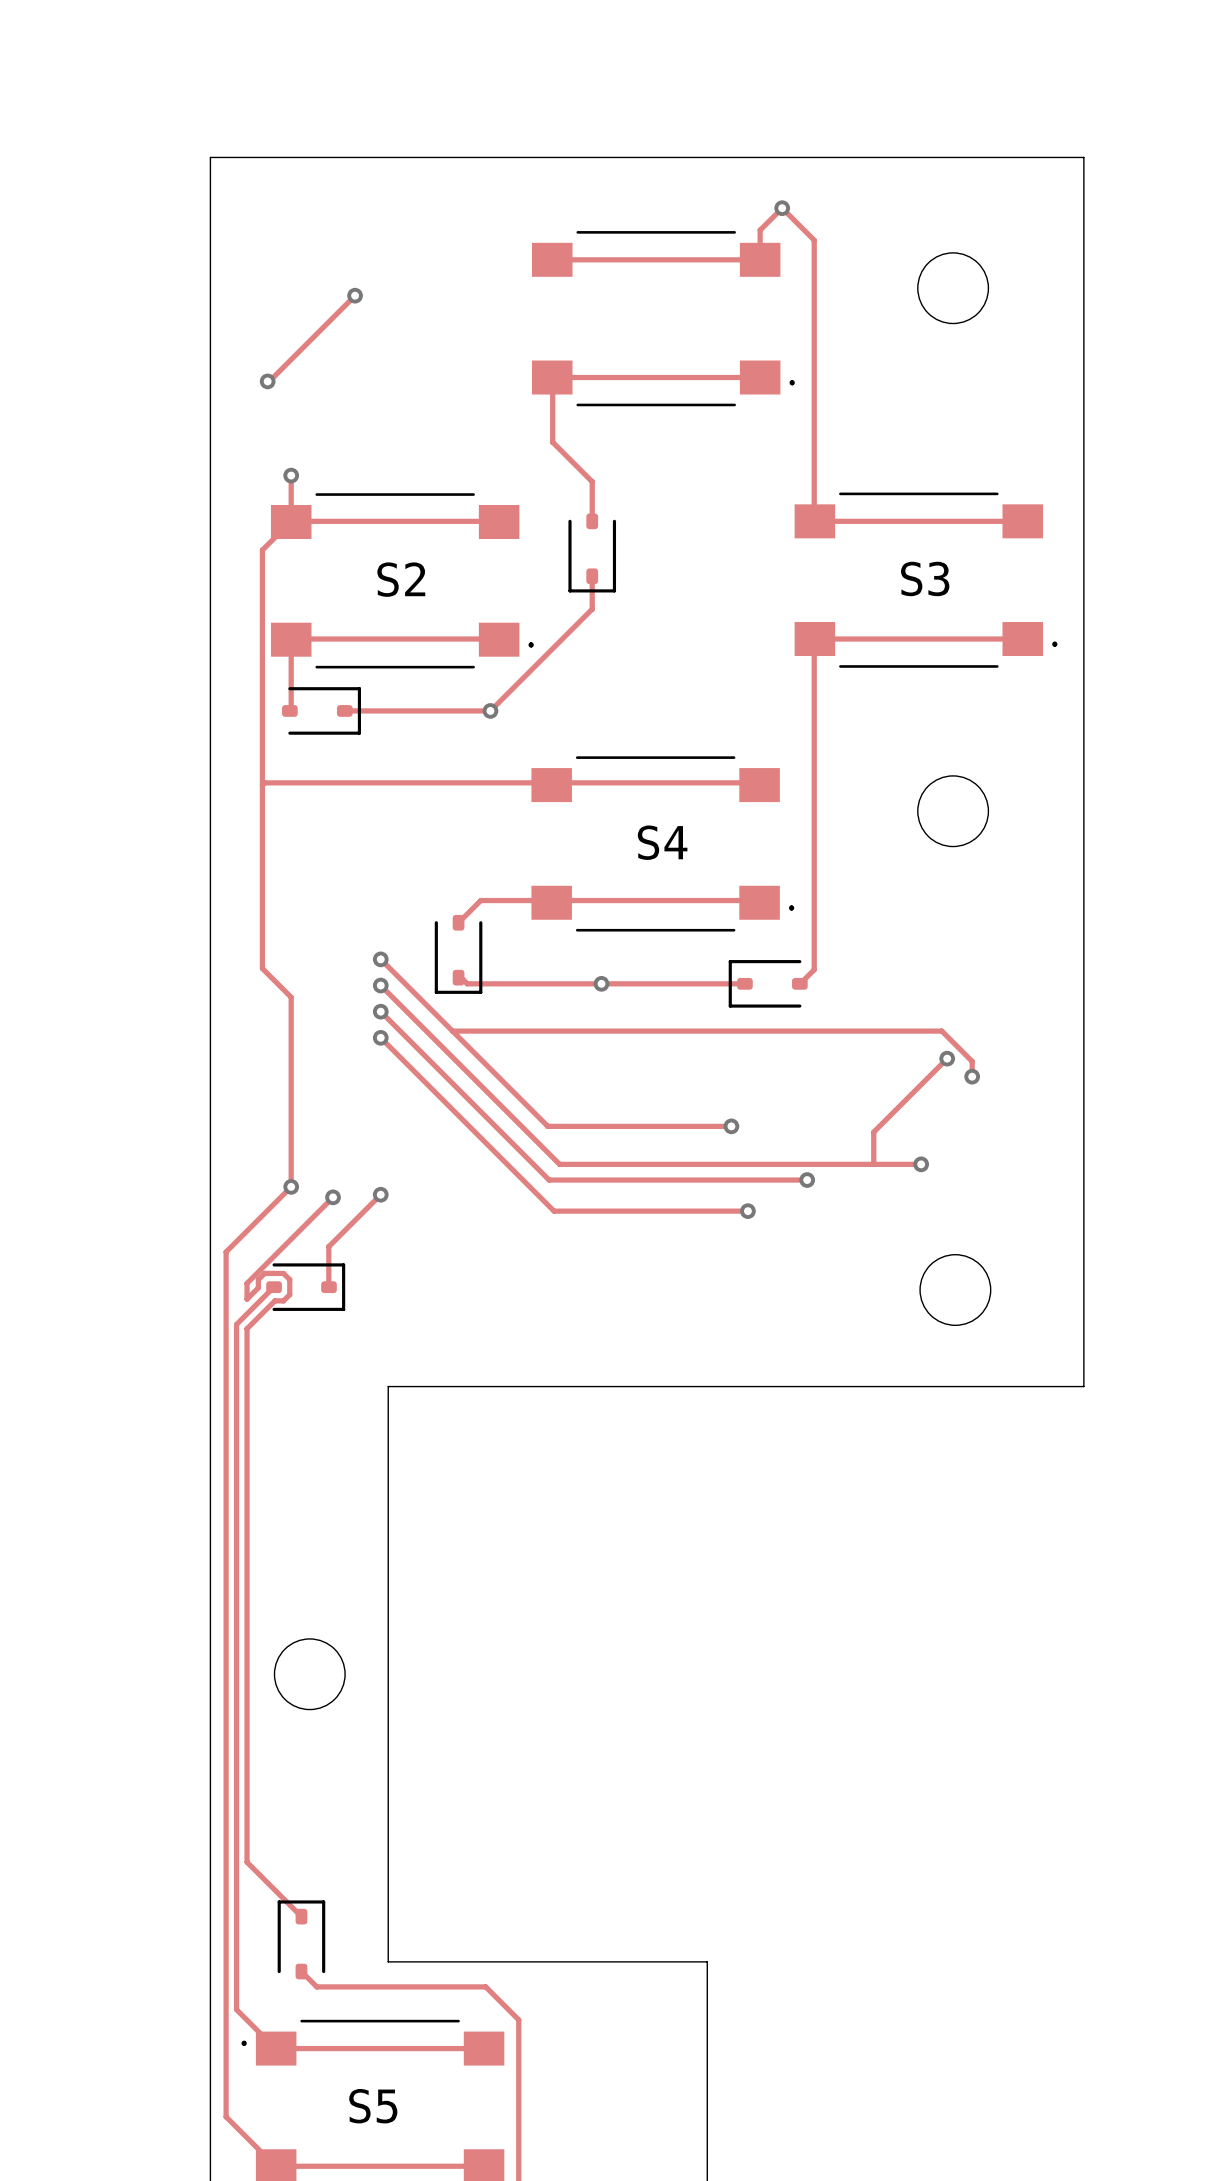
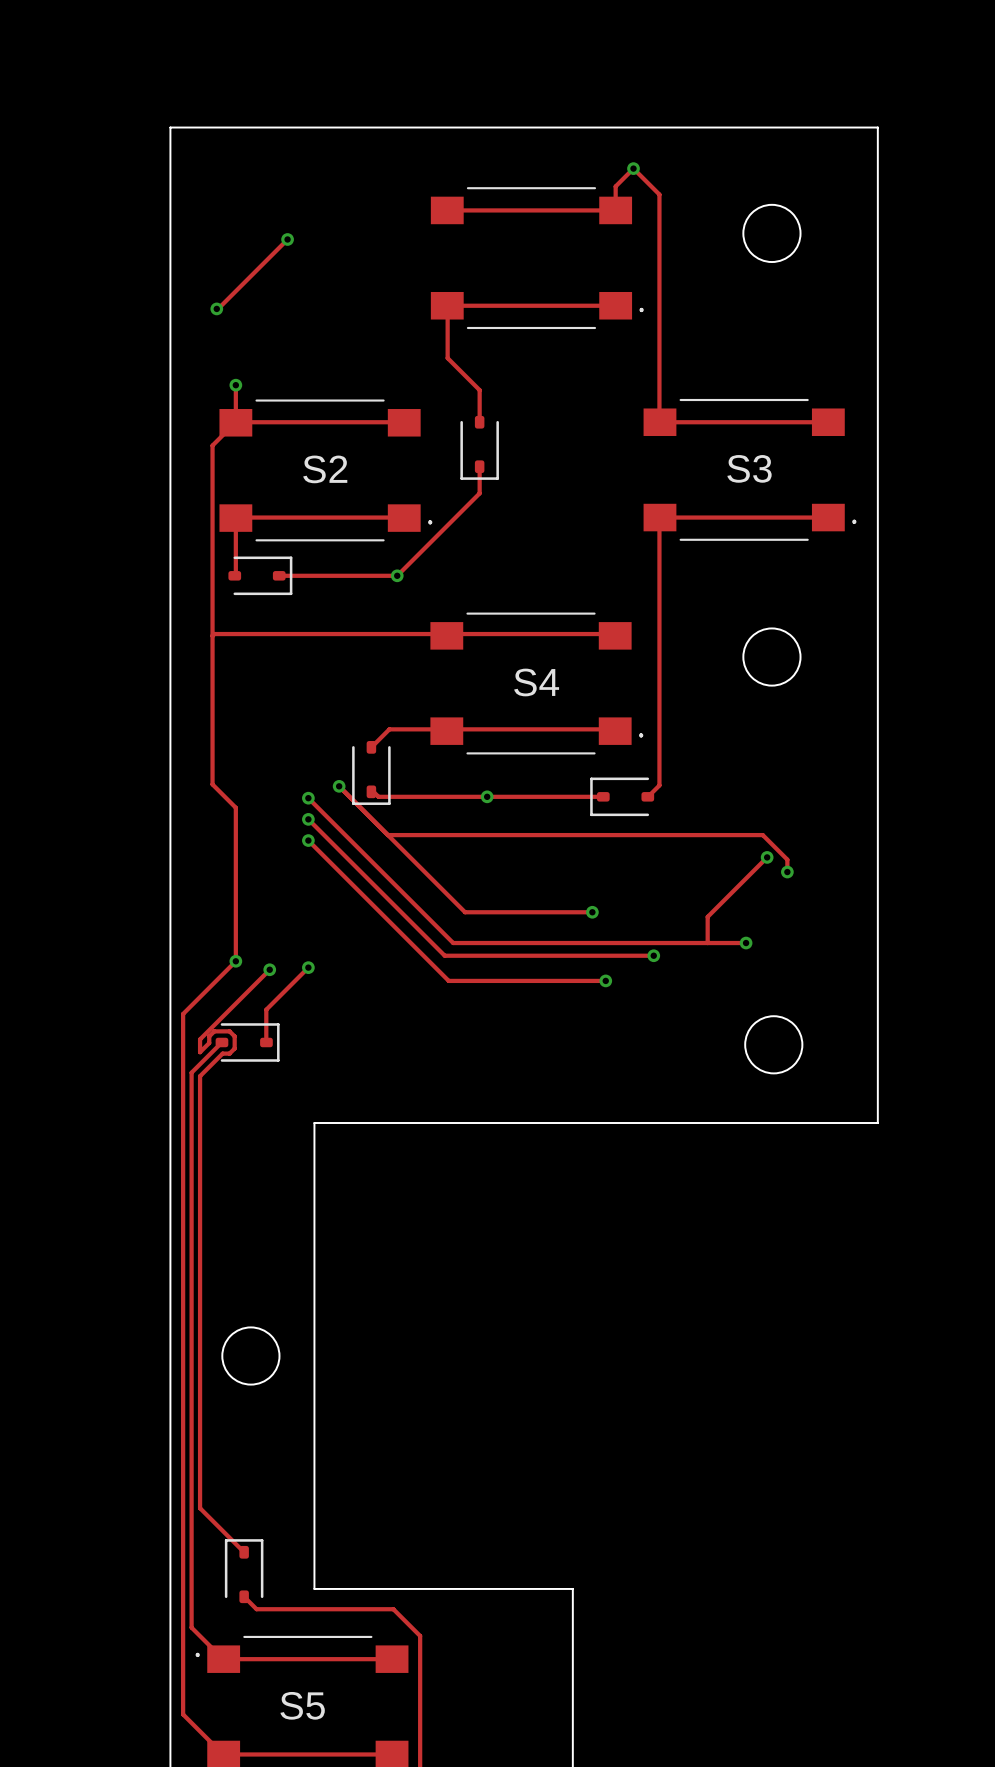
track: (380, 959) (547, 1126) (574, 1126) -> (339, 786) (465, 912)
via position: (380, 959) -> (339, 786)
track: (452, 1031) (478, 1031) -> none

